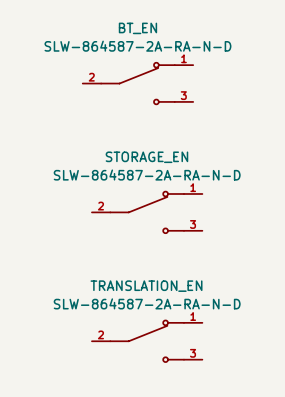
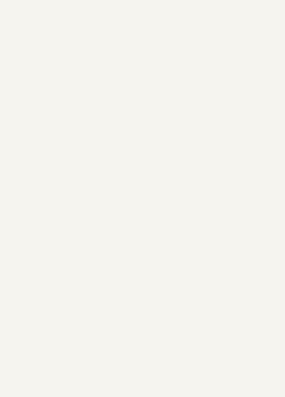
BT_EN: SLW-864587-2A-RA-N-D (137, 83) -> none
STORAGE_EN: SLW-864587-2A-RA-N-D (147, 212) -> none
TRANSLATION_EN: SLW-864587-2A-RA-N-D (147, 341) -> none

